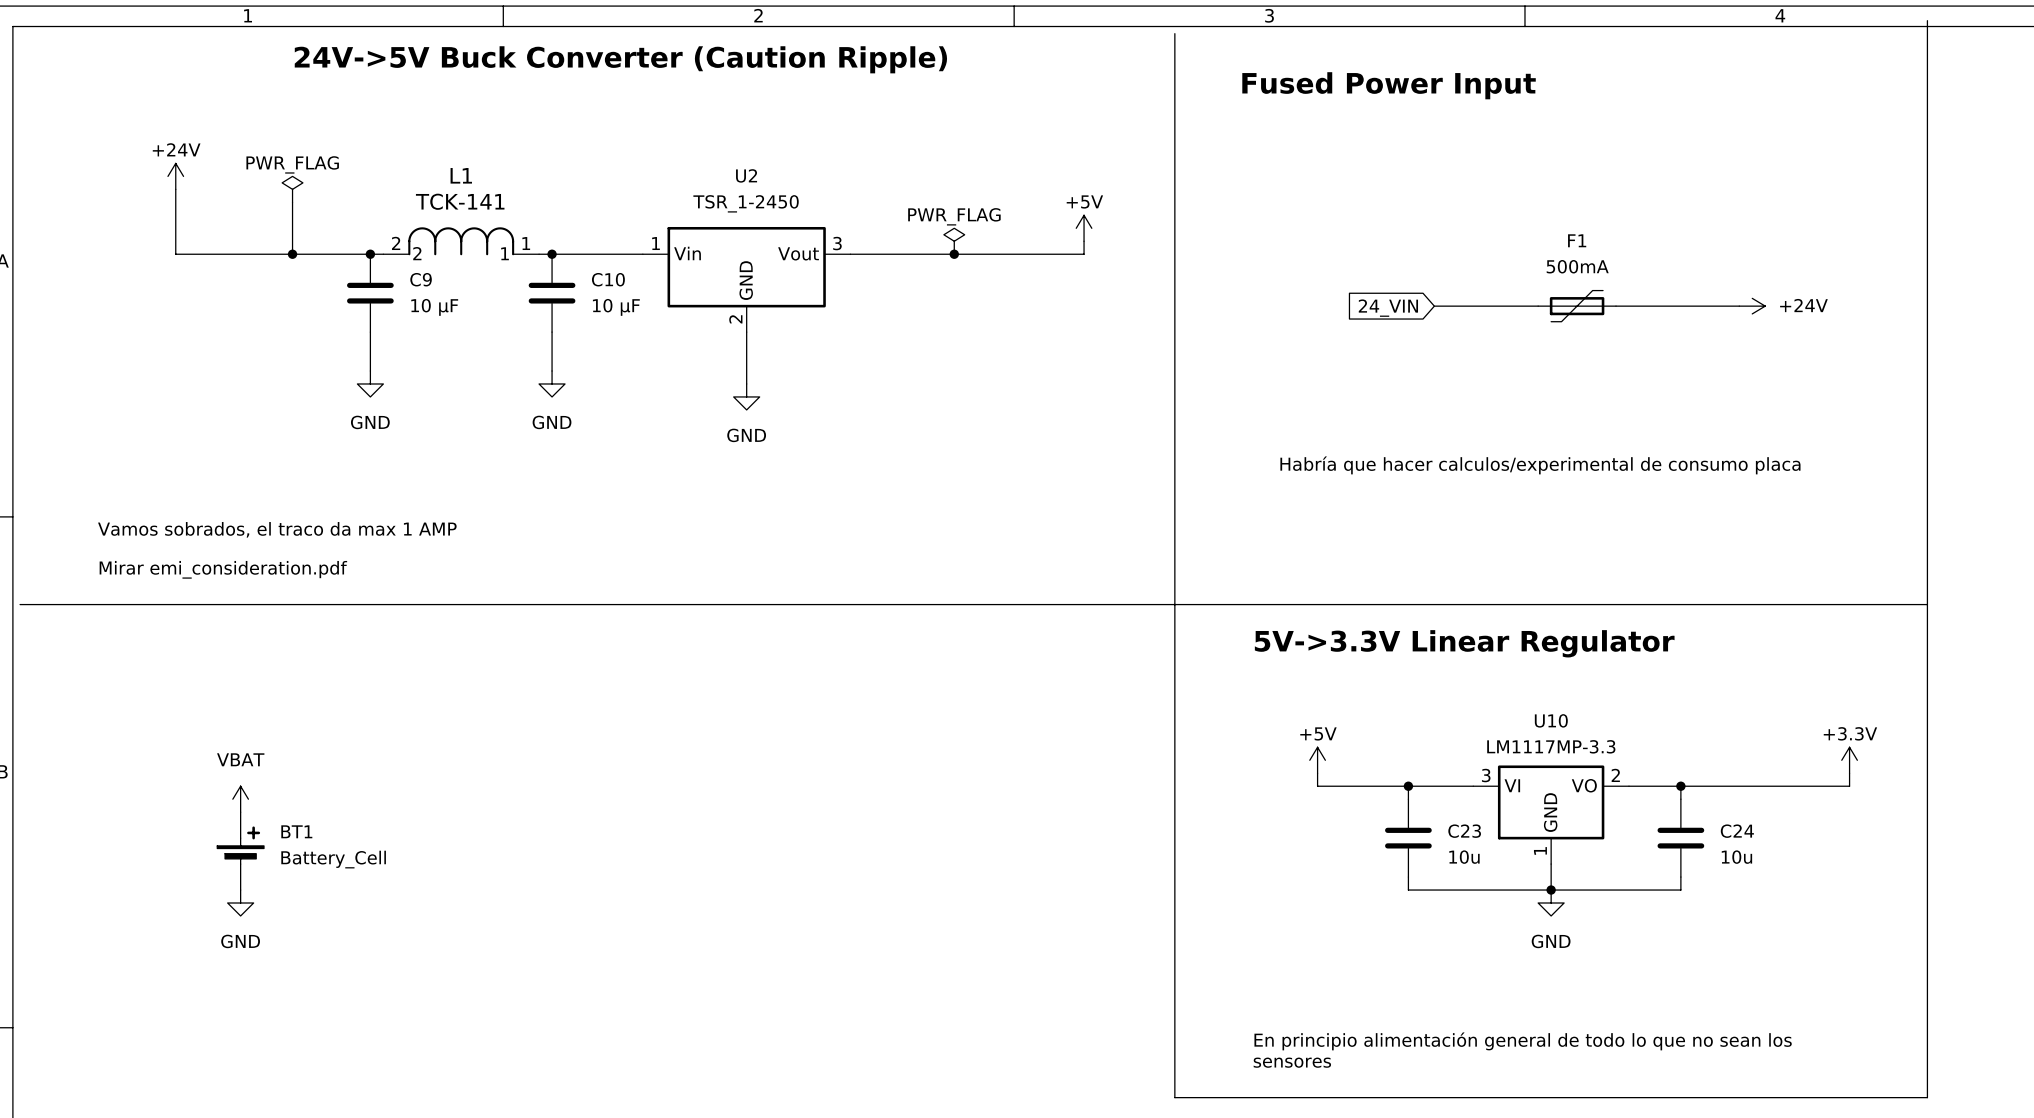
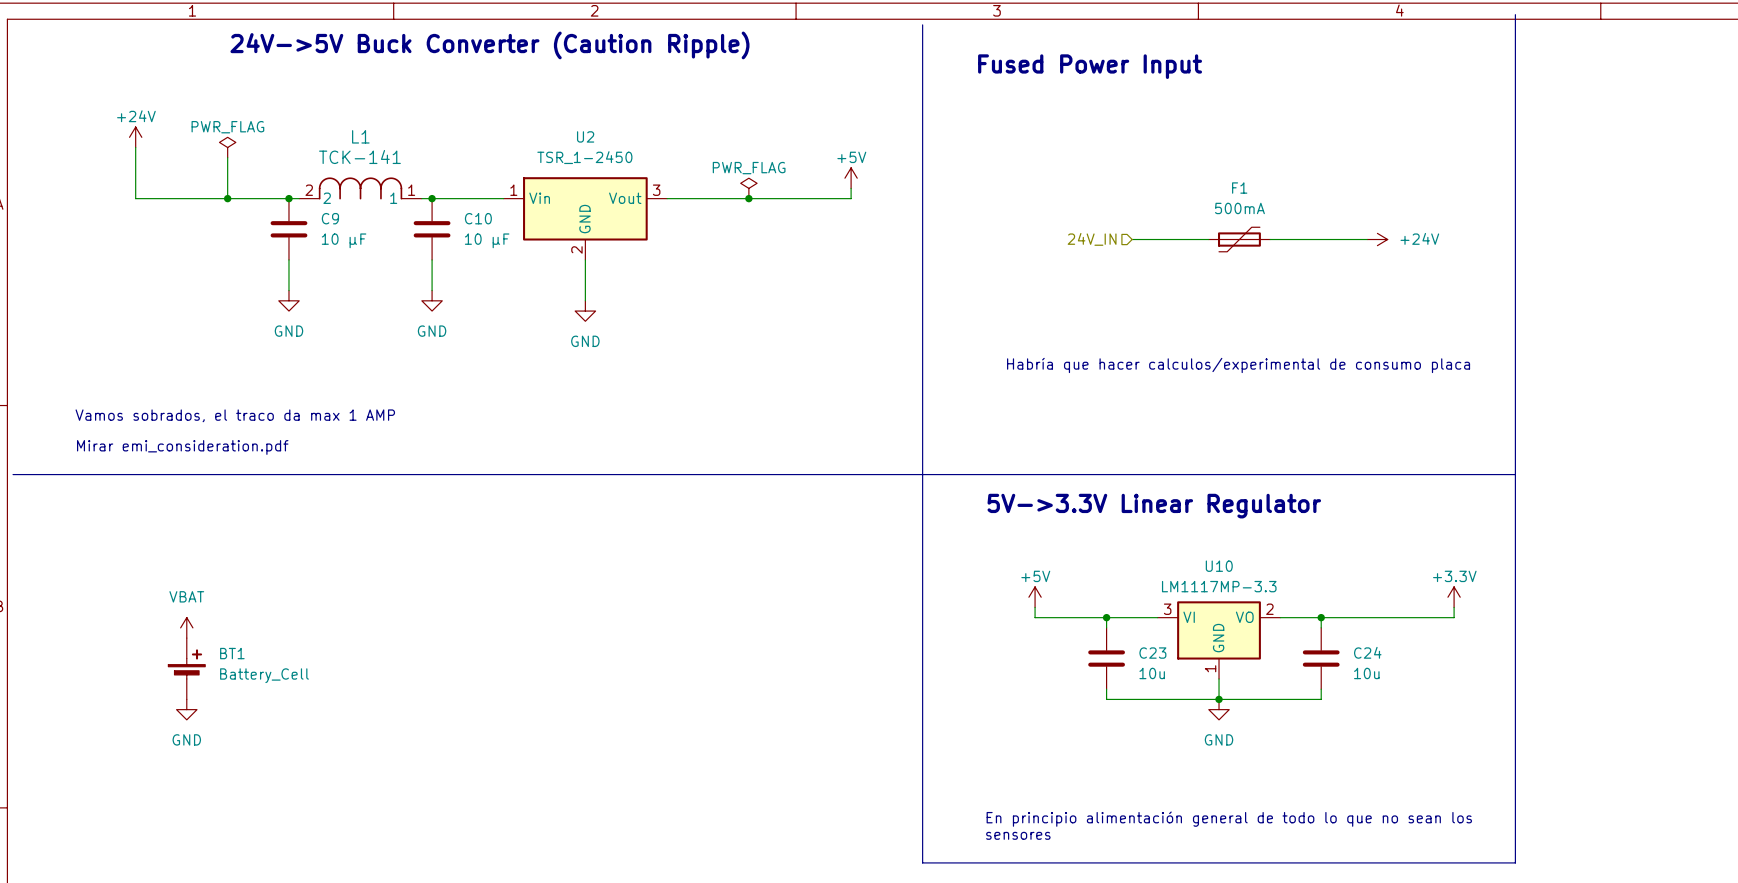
wire: (1434, 306) (1440, 306) -> none
hierarchical label: none -> 24V_IN (1092, 239)
global label: 24_VIN (1388, 308) -> none

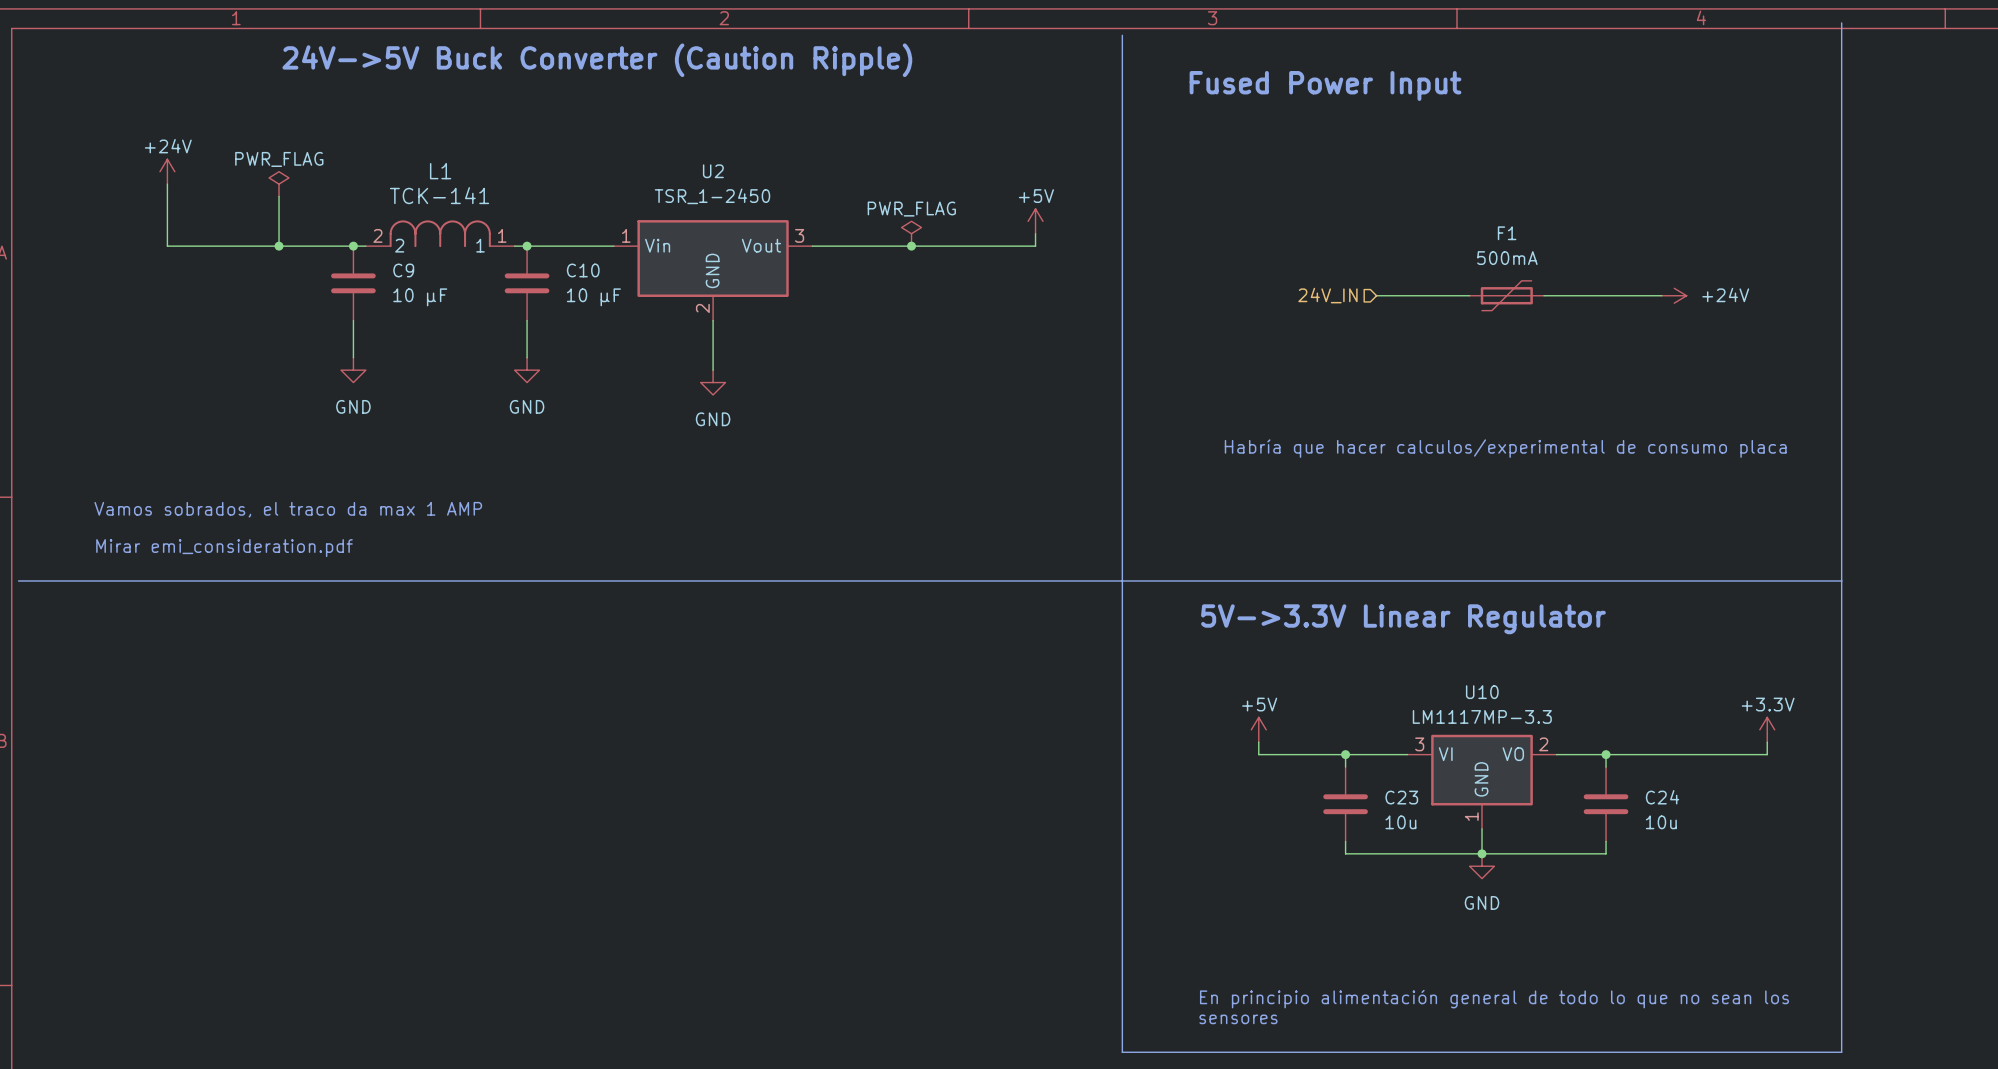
power symbol: VBAT (186, 627) -> none
BT1: Battery_Cell (186, 668) -> none
power symbol: GND (186, 709) -> none

